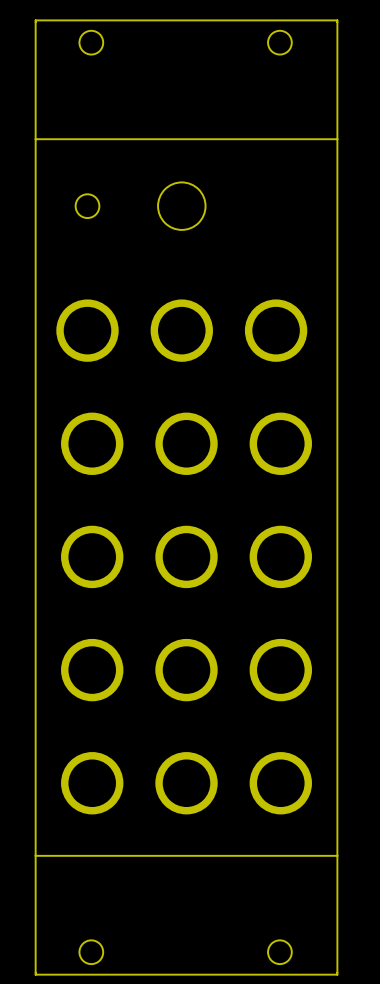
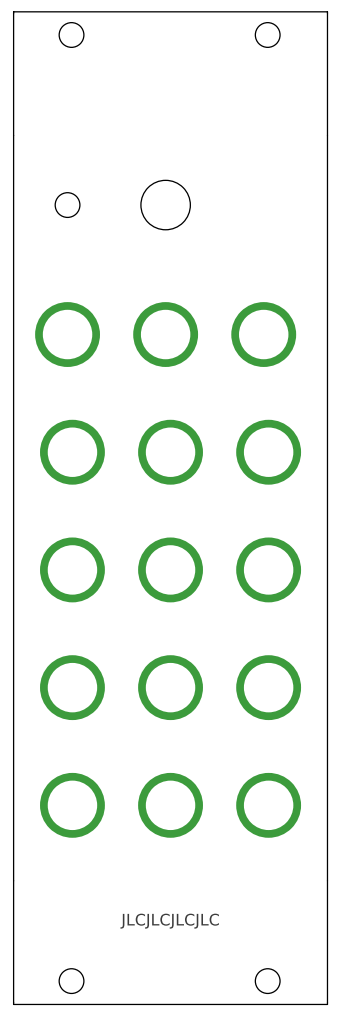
board edge: (35, 139) (337, 139) -> none
board edge: (35, 855) (337, 855) -> none
text: none -> JLCJLCJLCJLC (169, 921)

